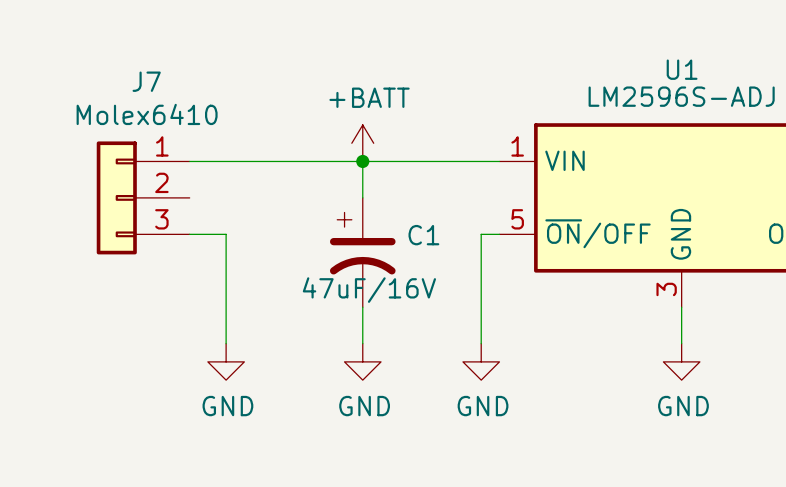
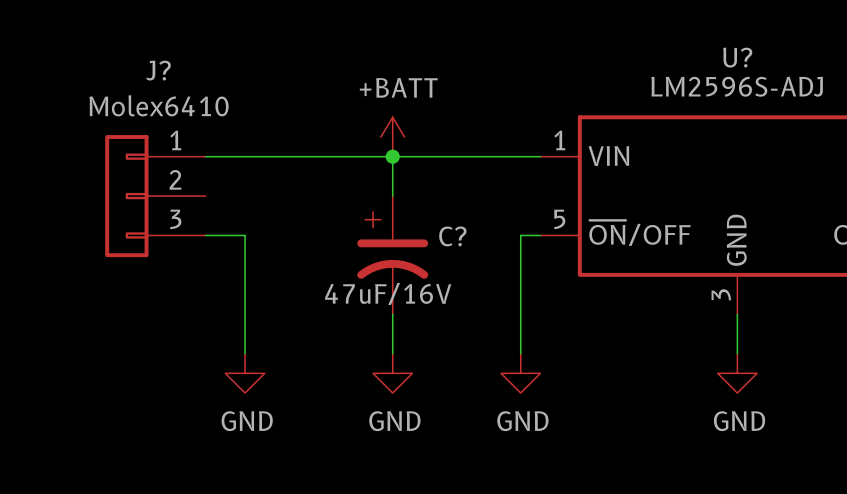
U1 name: U1 (682, 69) -> U? (737, 57)
J7 name: J7 (146, 81) -> J? (158, 70)
C1 name: C1 (423, 235) -> C? (452, 236)

